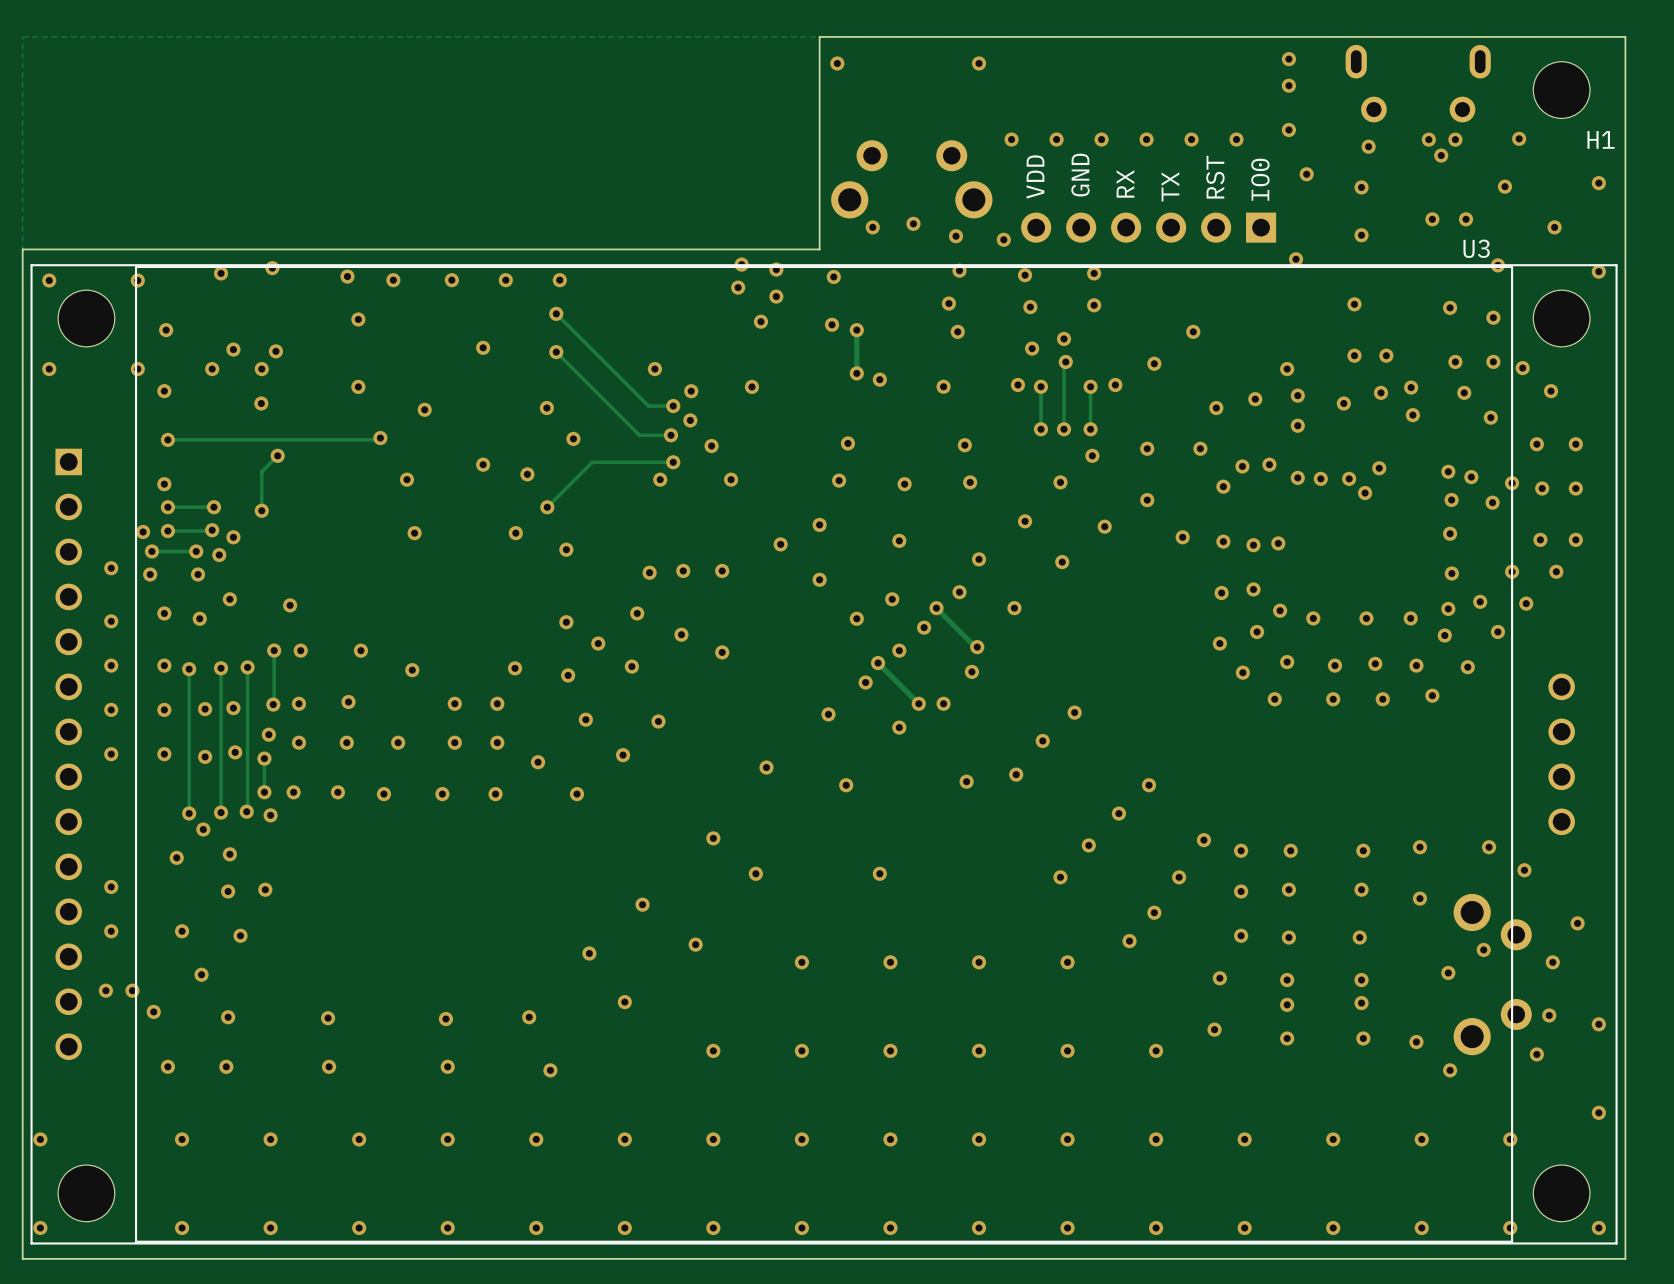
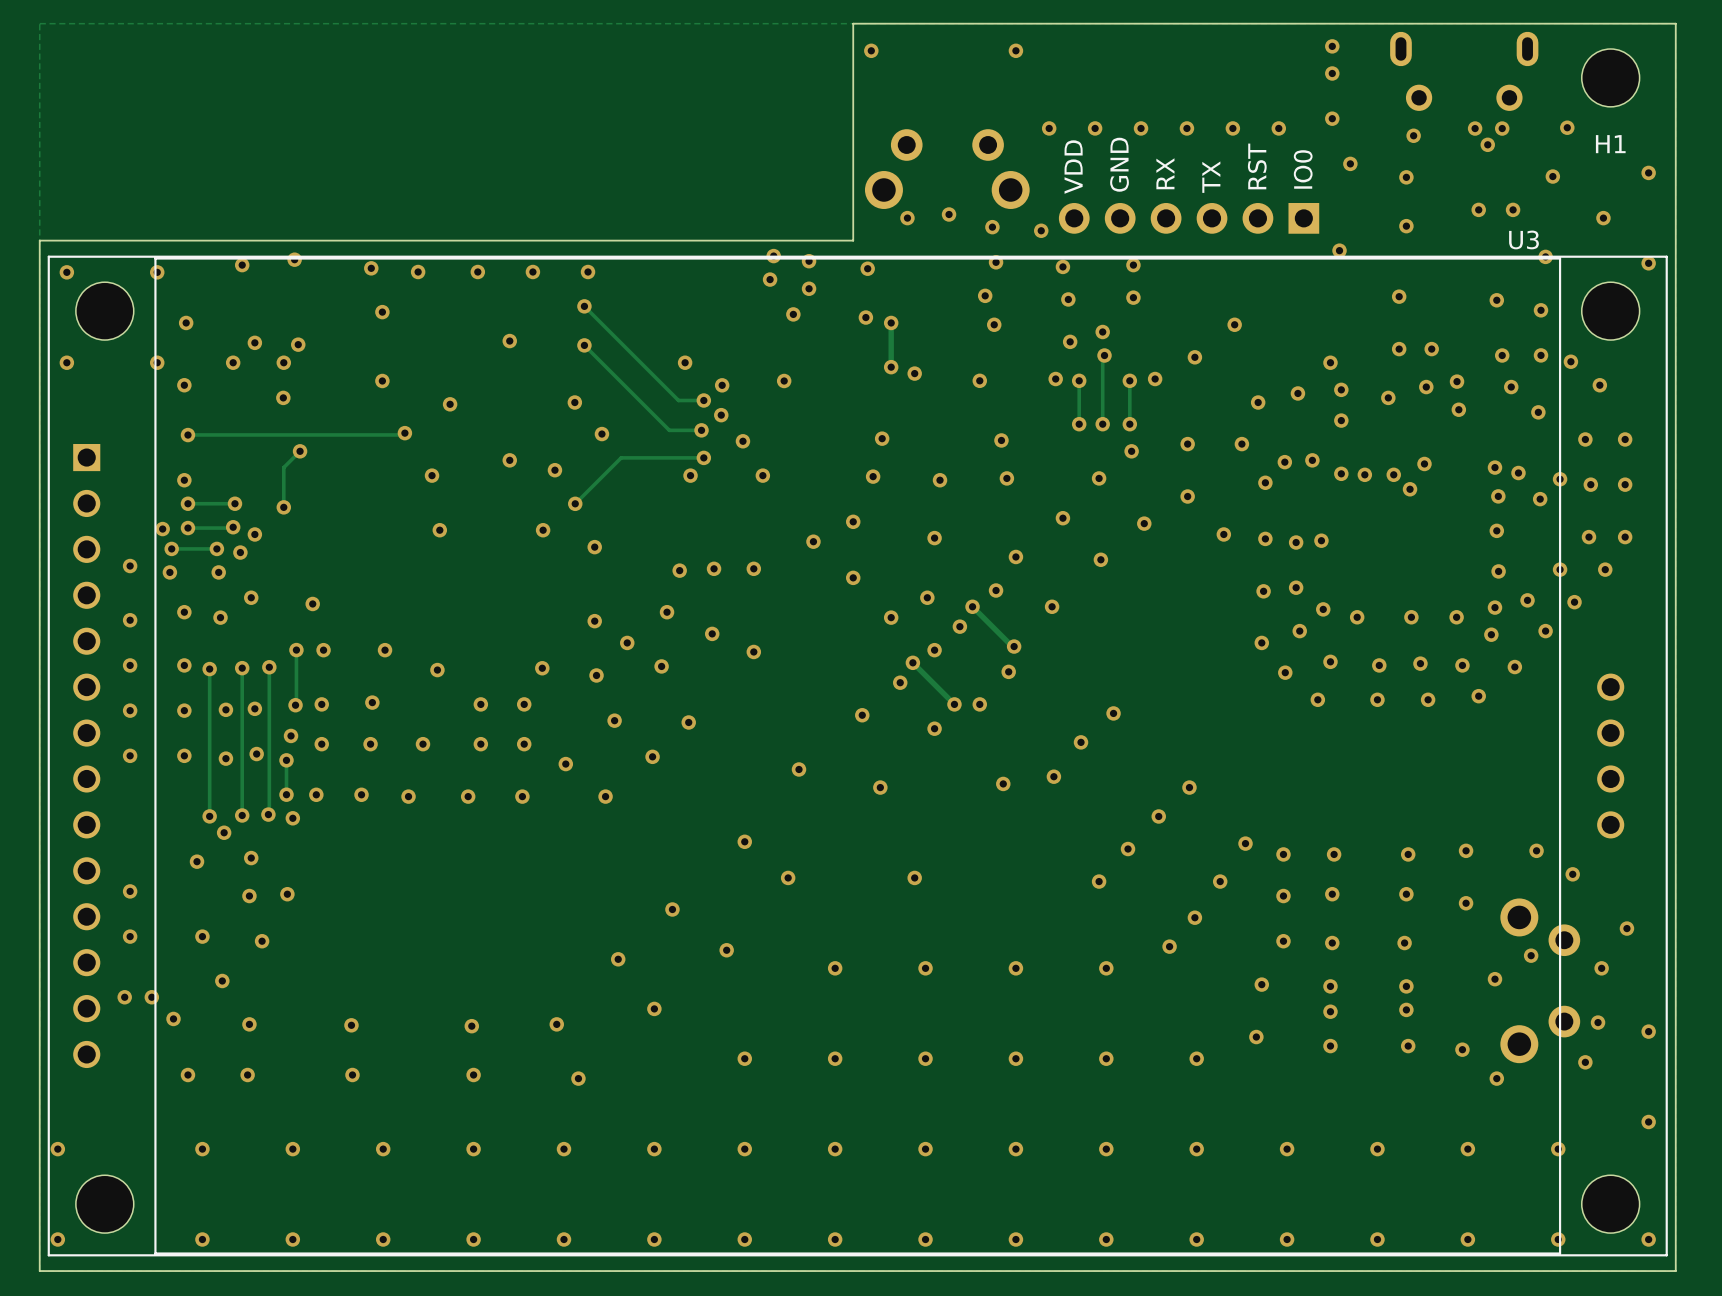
H1 name position: H1 (1601, 139) -> H1 (1610, 144)

